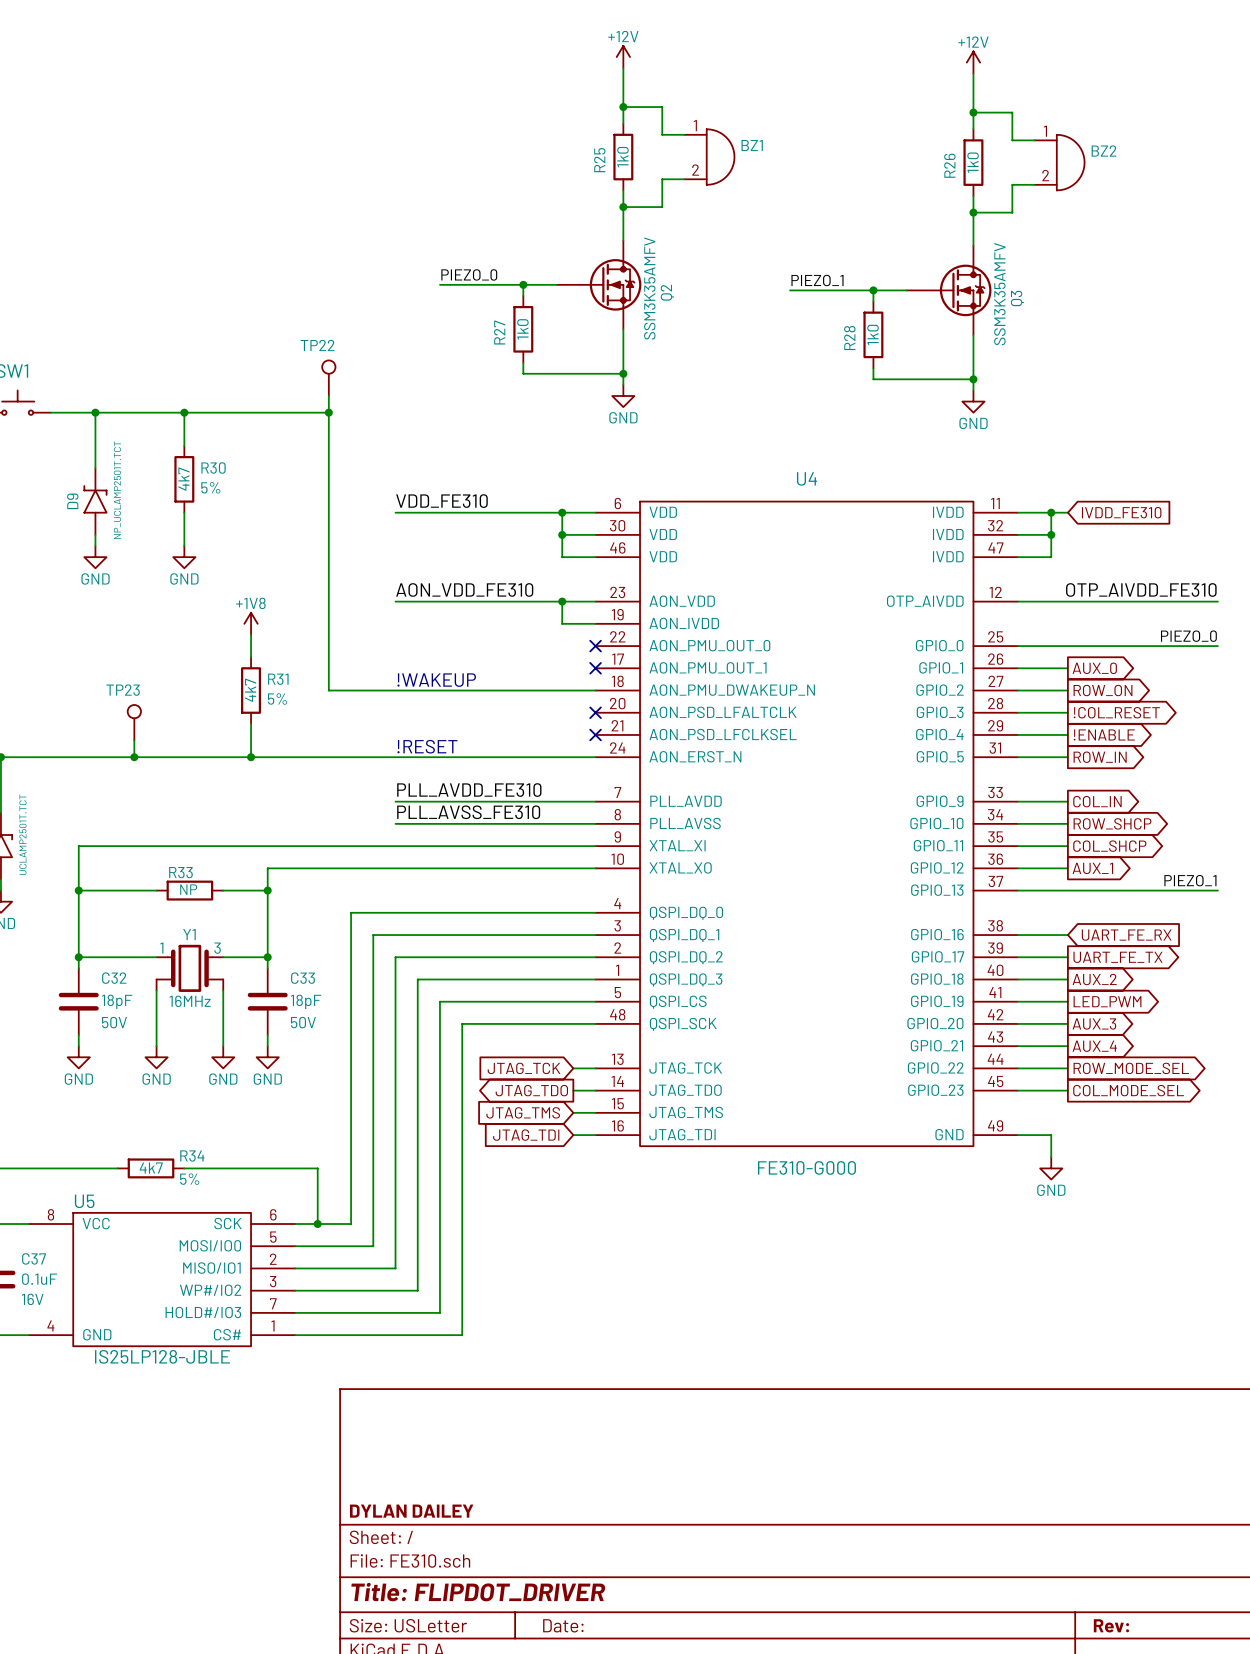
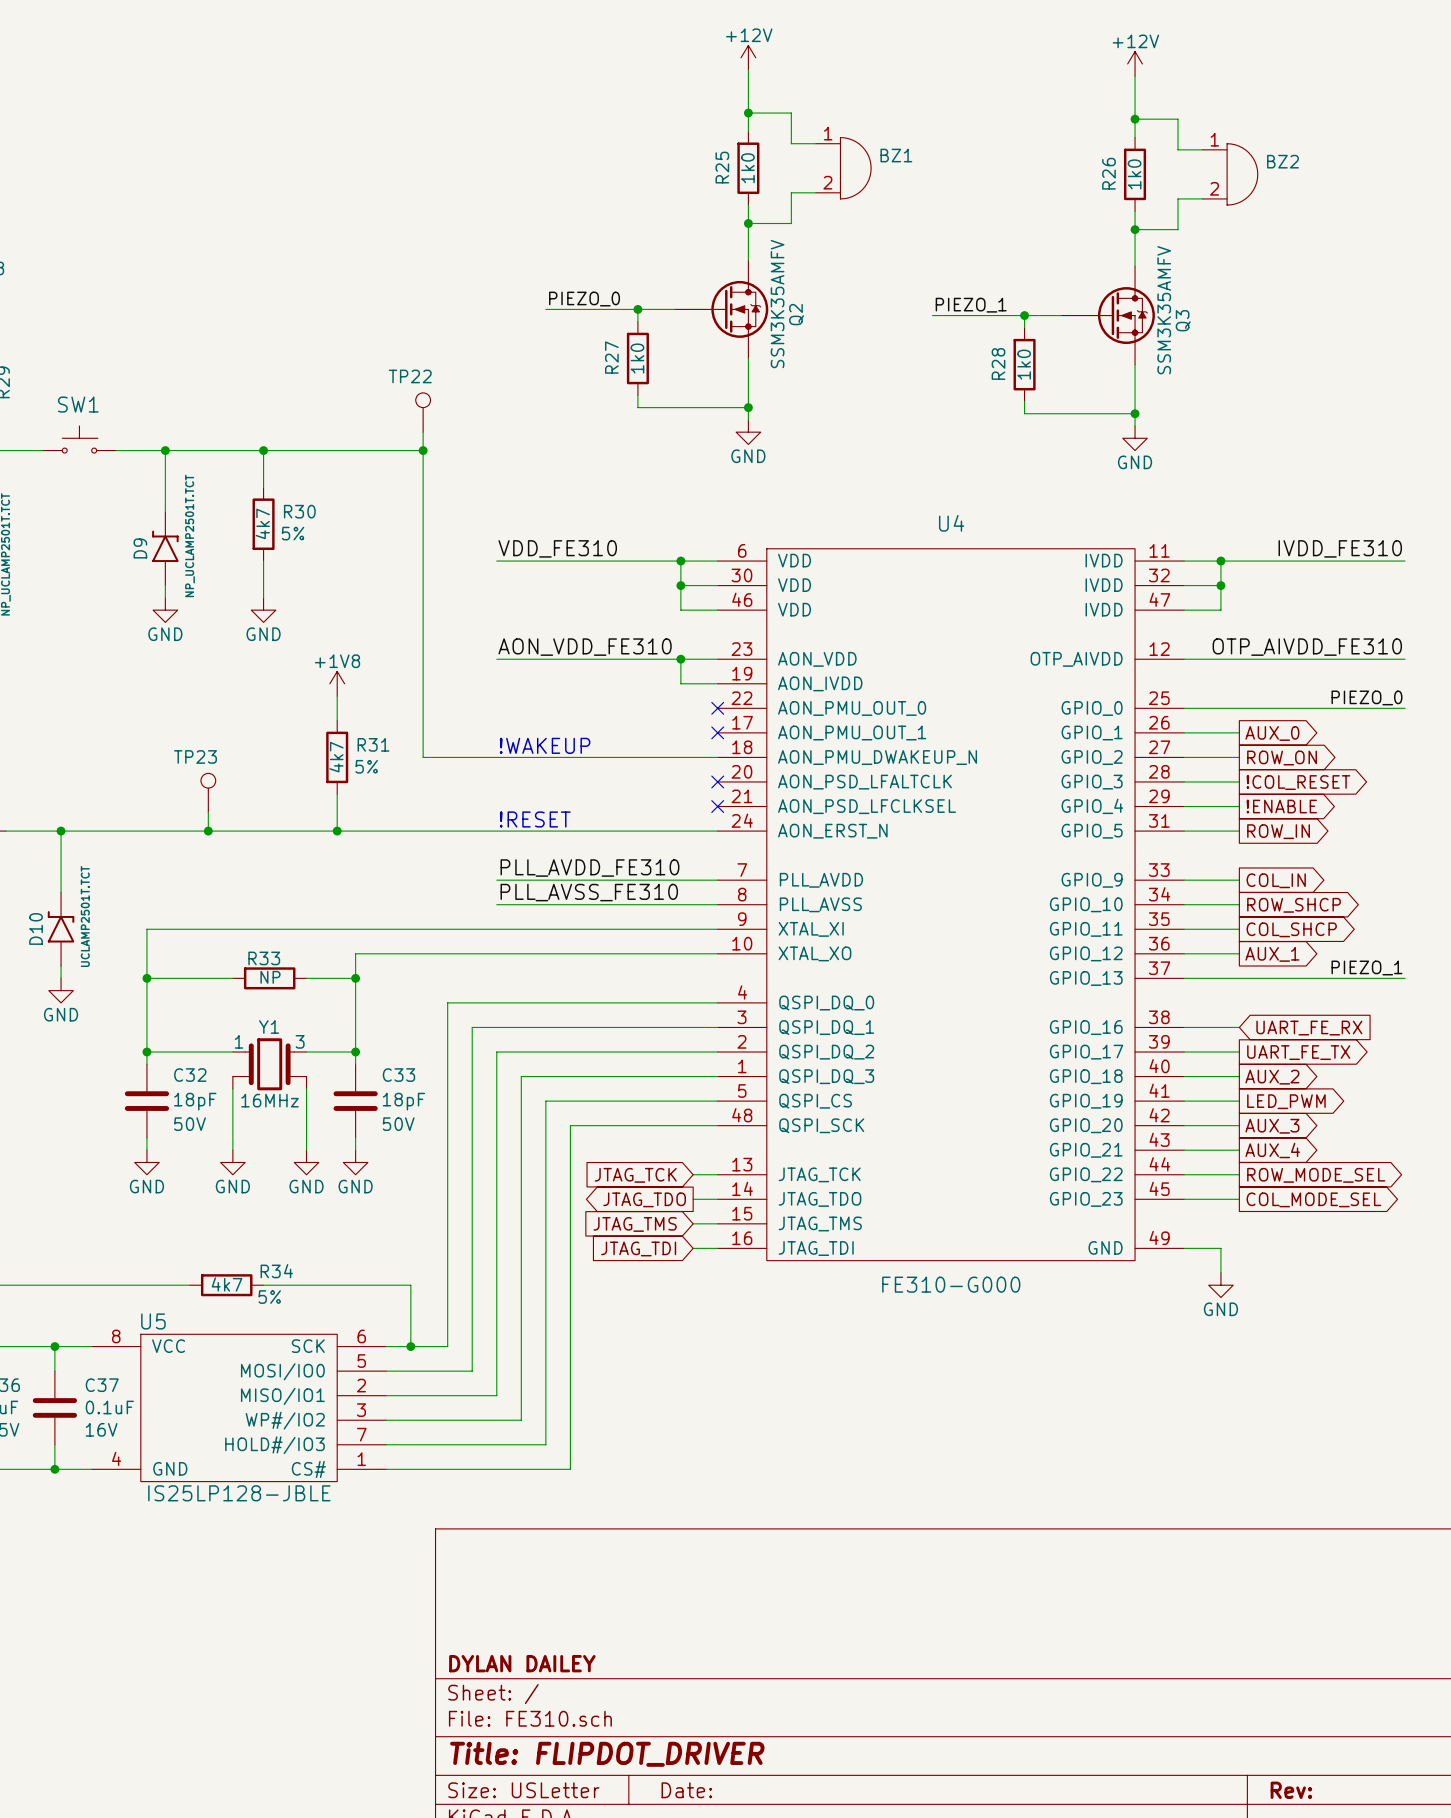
label: none -> IVDD_FE310 (1340, 548)
wire: none -> (1239, 561) (1405, 561)
global label: IVDD_FE310 (1121, 512) -> none

